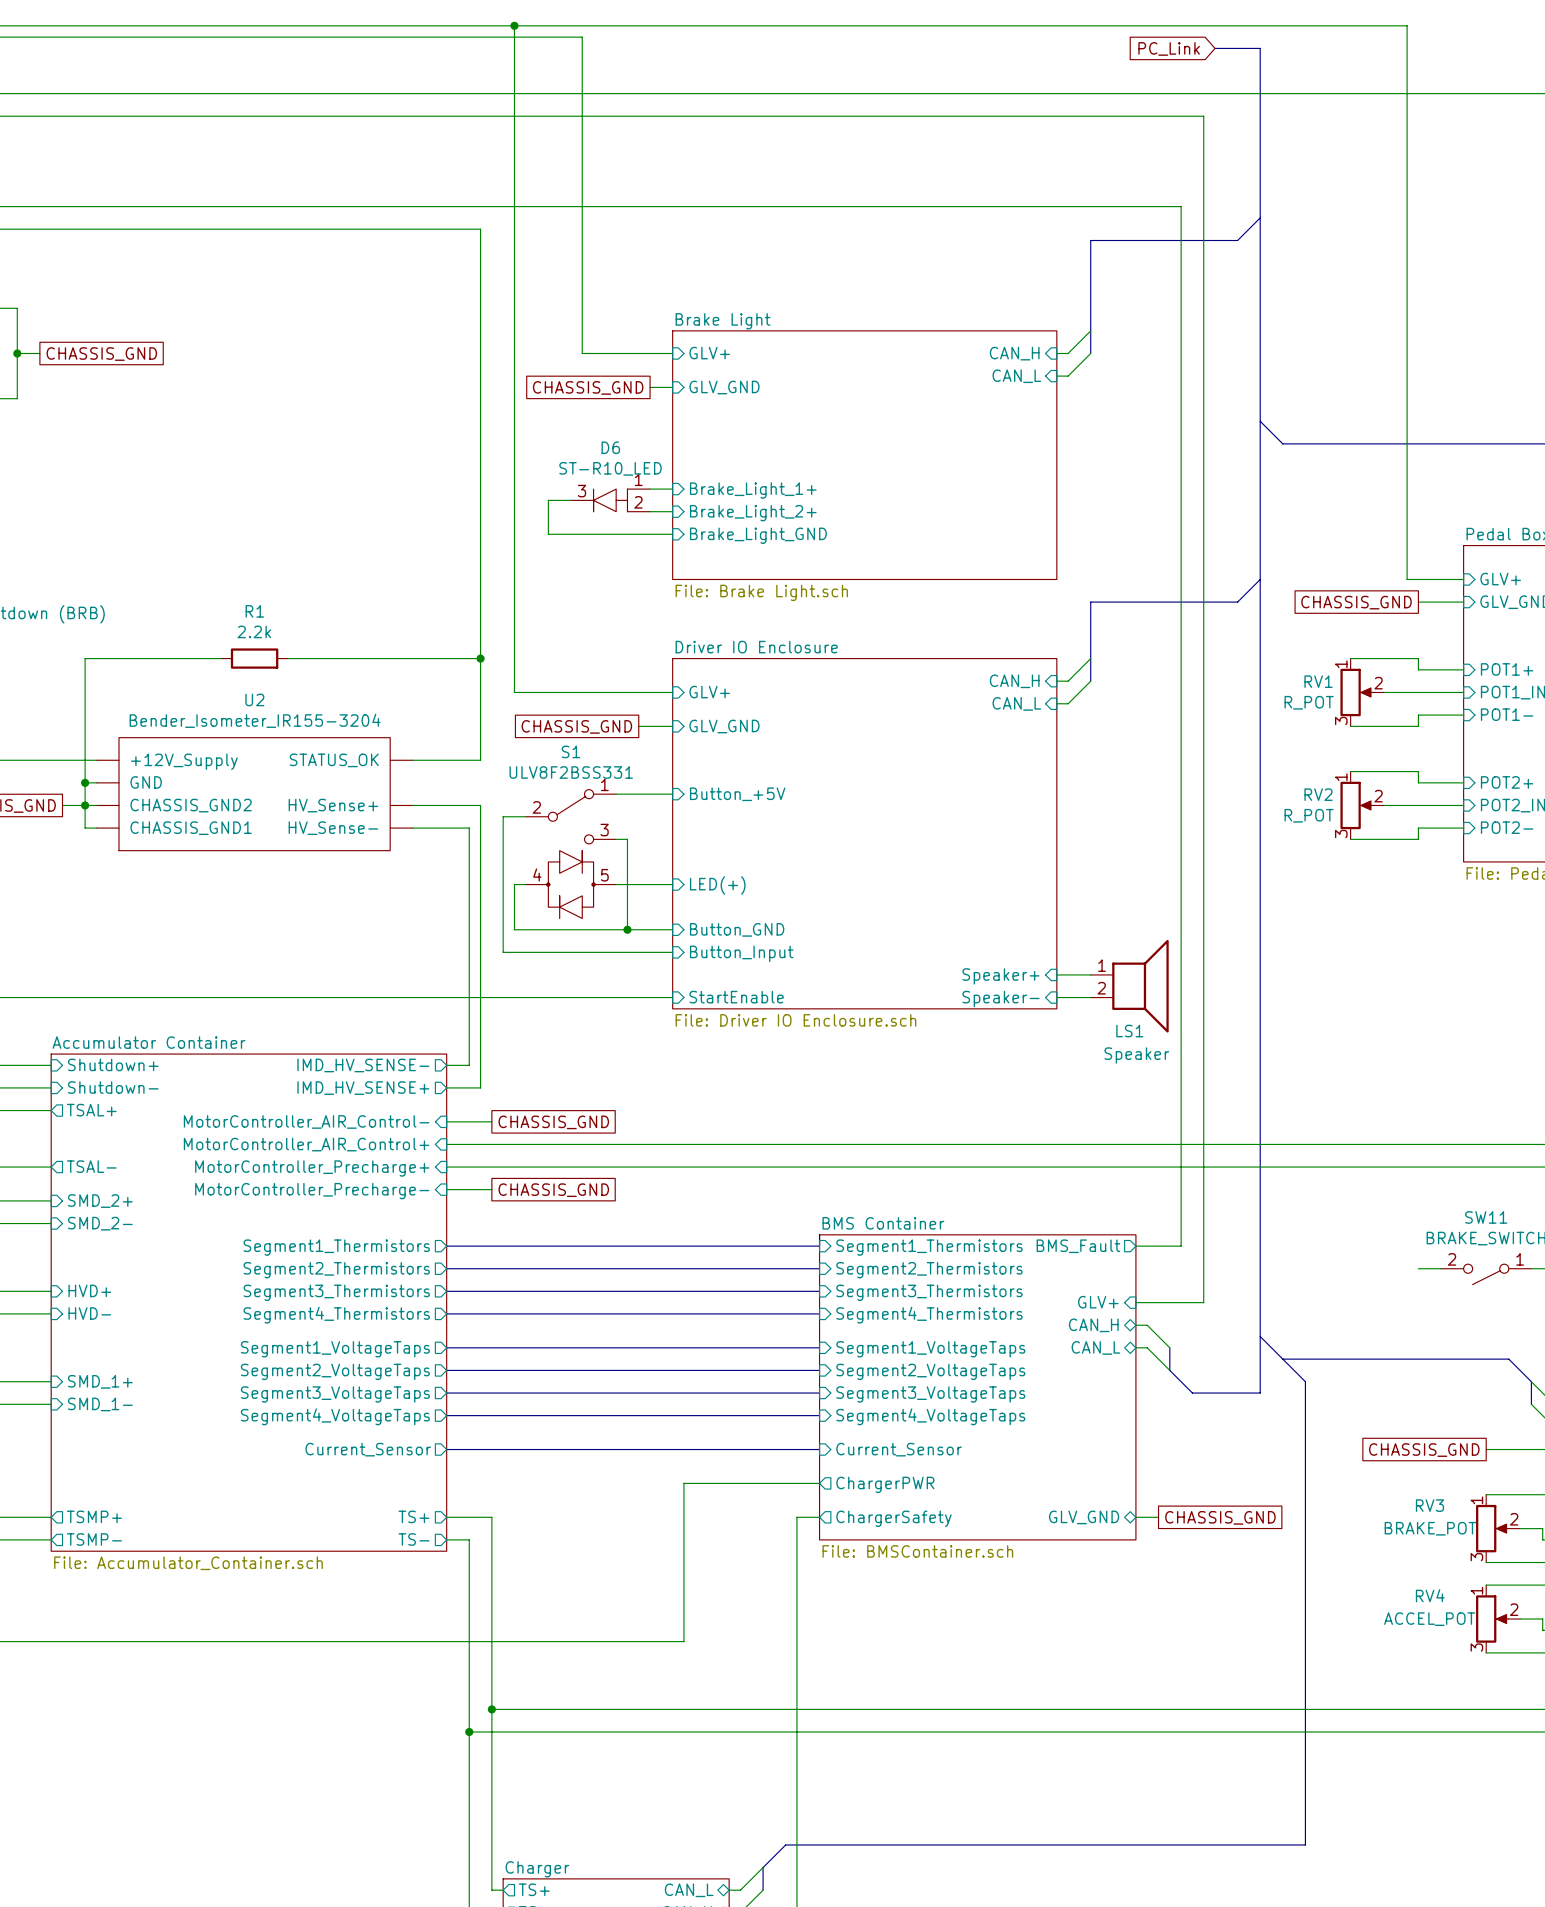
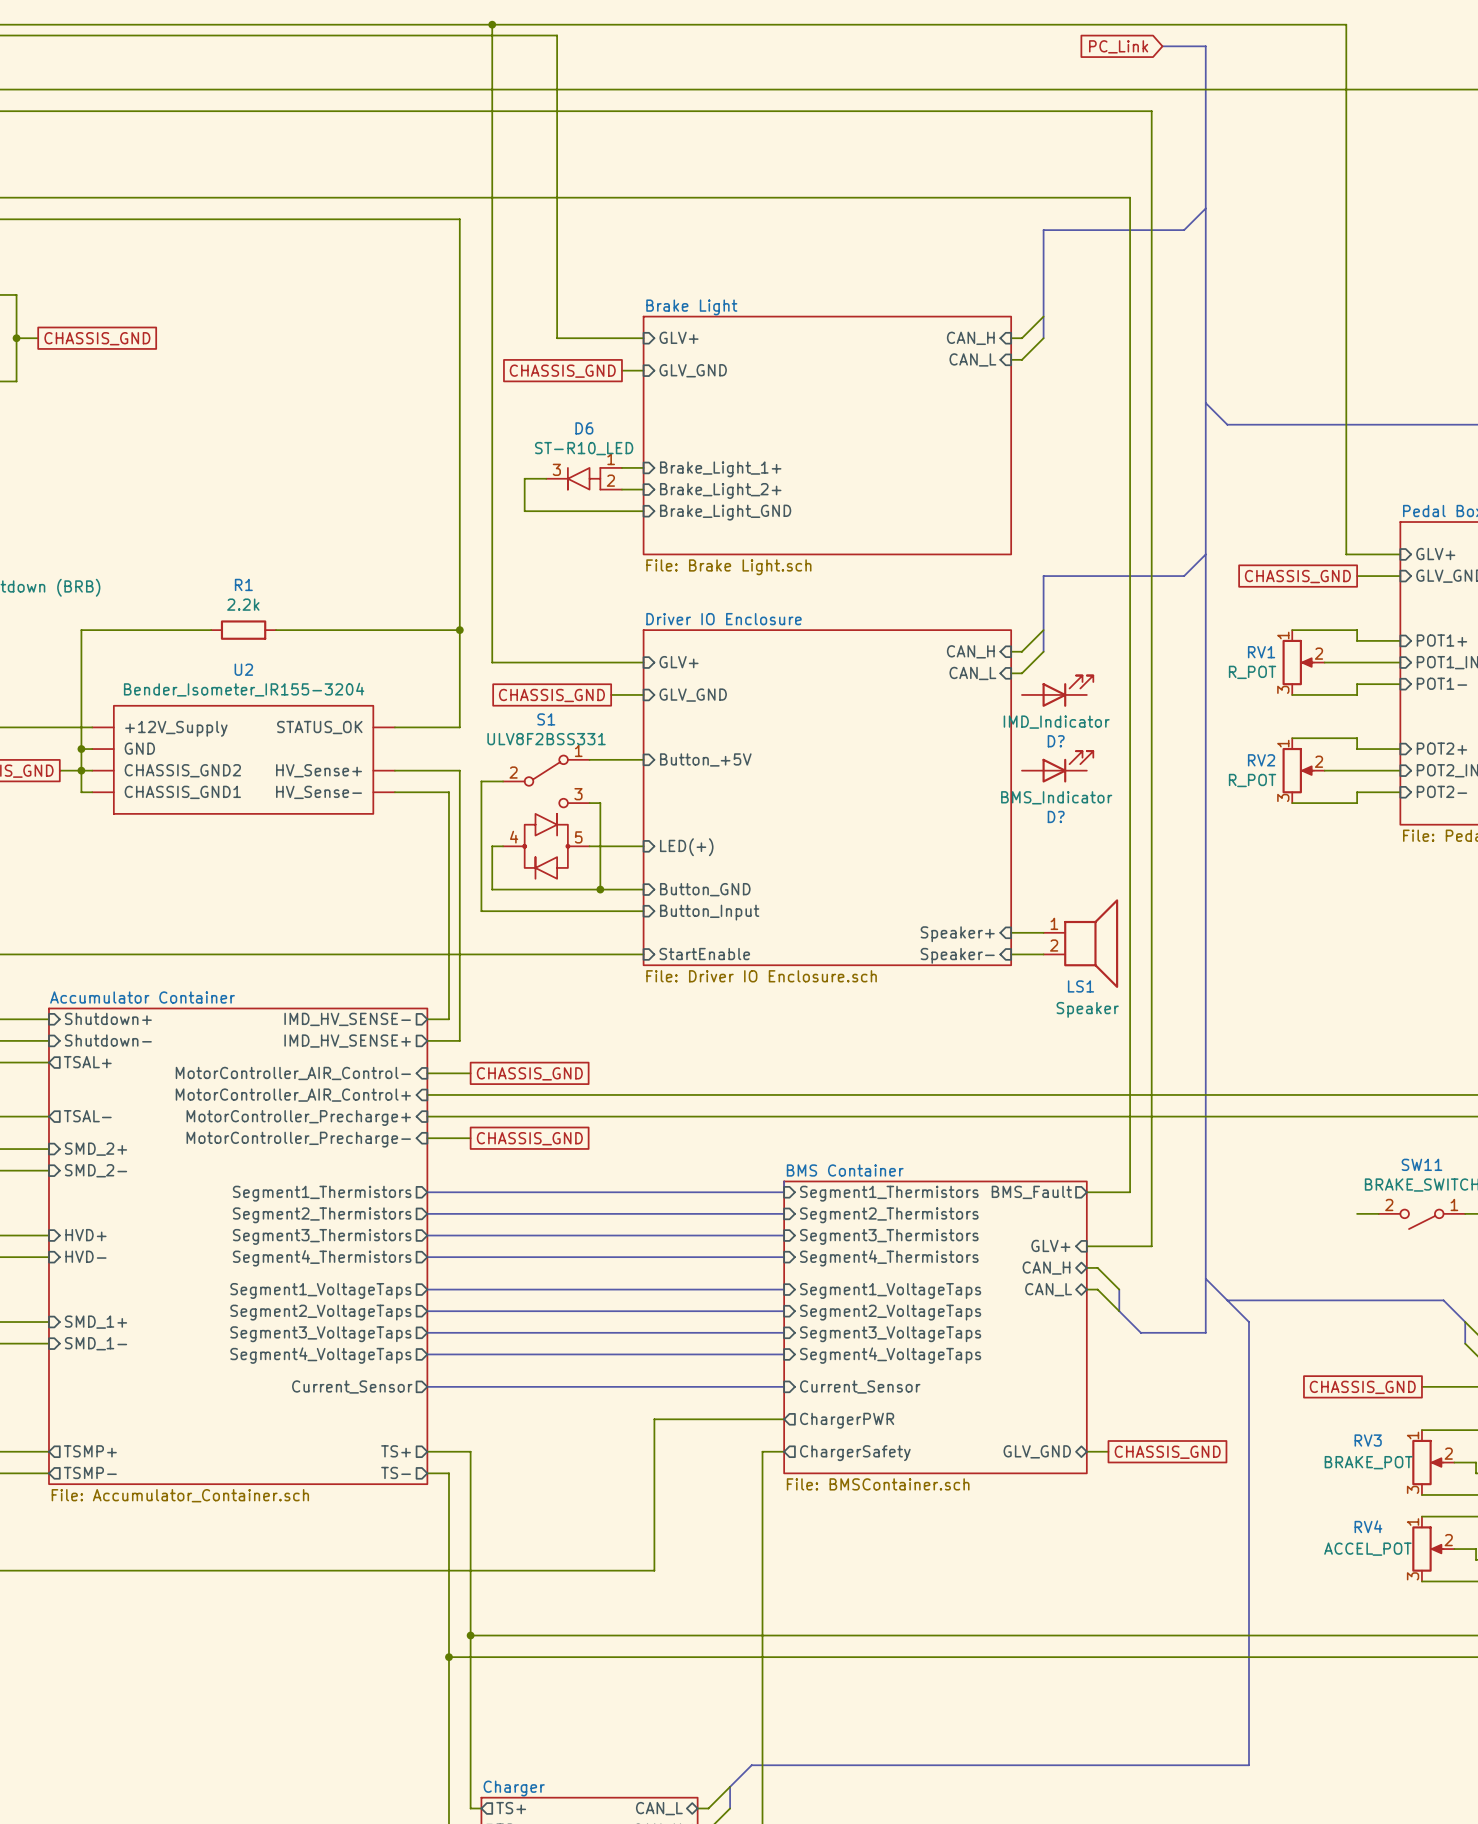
D?: none -> IMD_Indicator (1057, 691)
D?: none -> BMS_Indicator (1057, 766)

